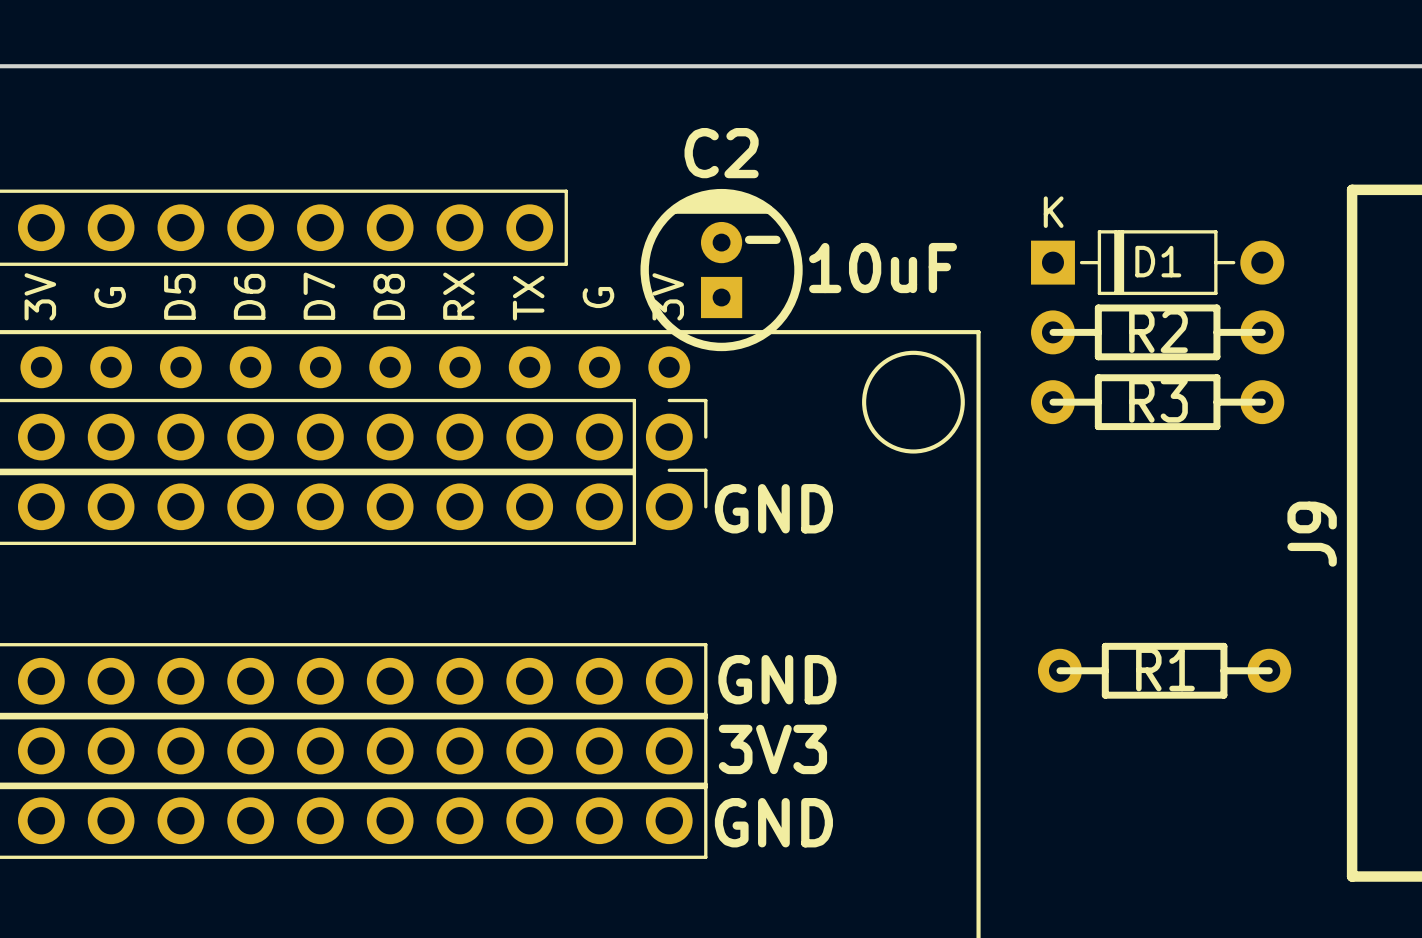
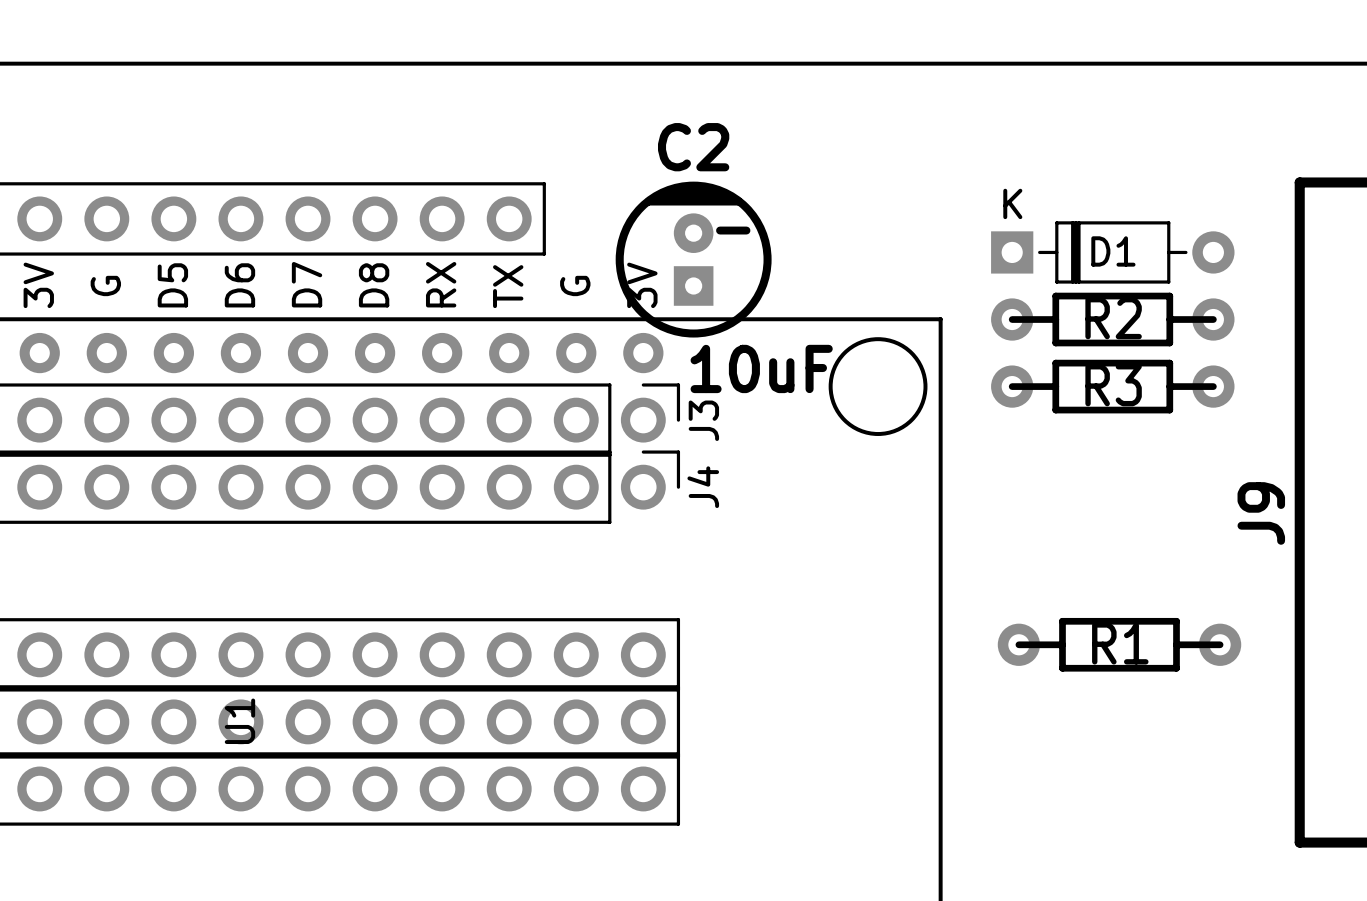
C2 value position: 10uF (883, 268) -> 10uF (761, 368)
J3 name: none -> J3 (703, 420)
J4 name: none -> J4 (703, 487)
text: GND (773, 508) -> none
text: GND (777, 679) -> none
text: 3V3 (772, 749) -> none
U1 name: none -> U1 (239, 721)
text: GND (773, 822) -> none

